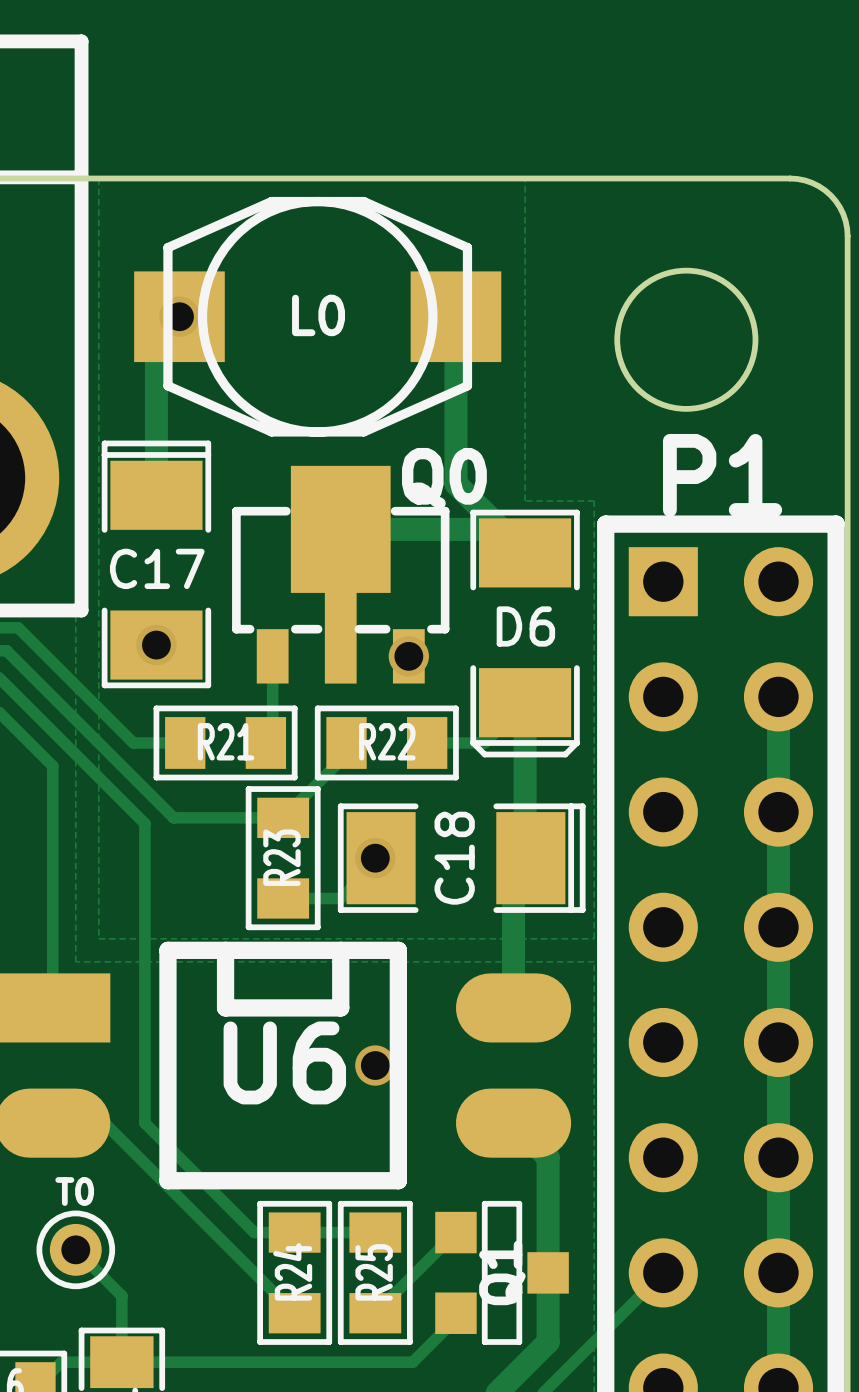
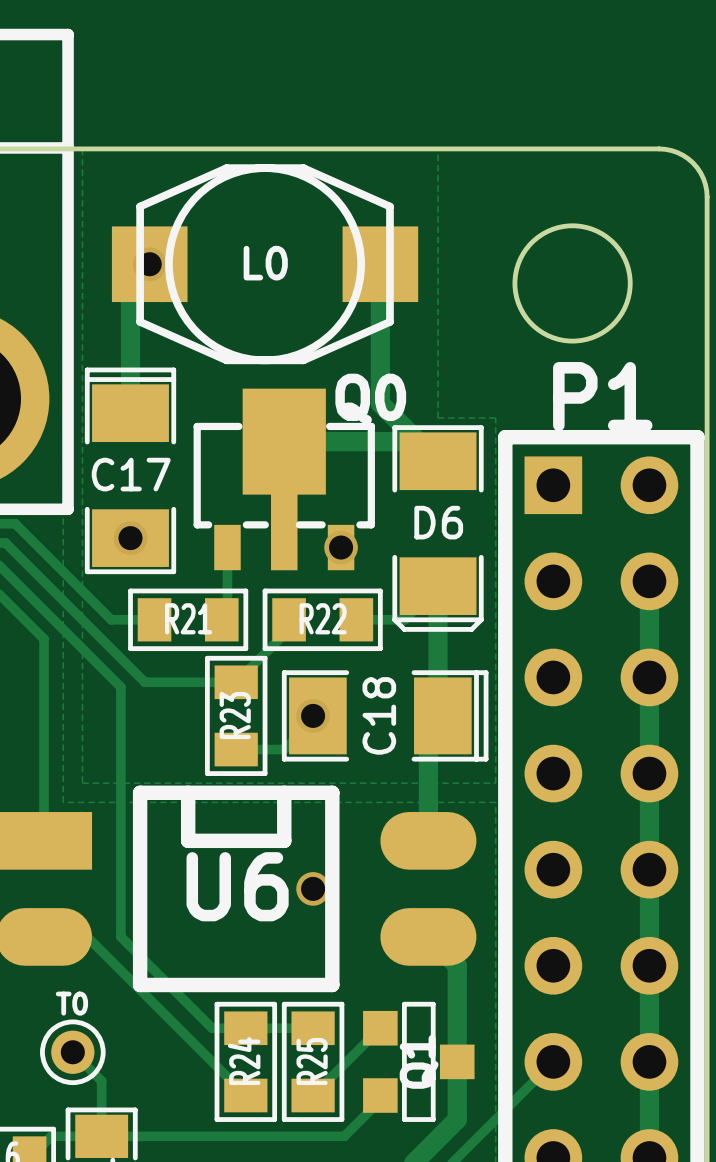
T0 position: (75, 1249) -> (72, 1052)

